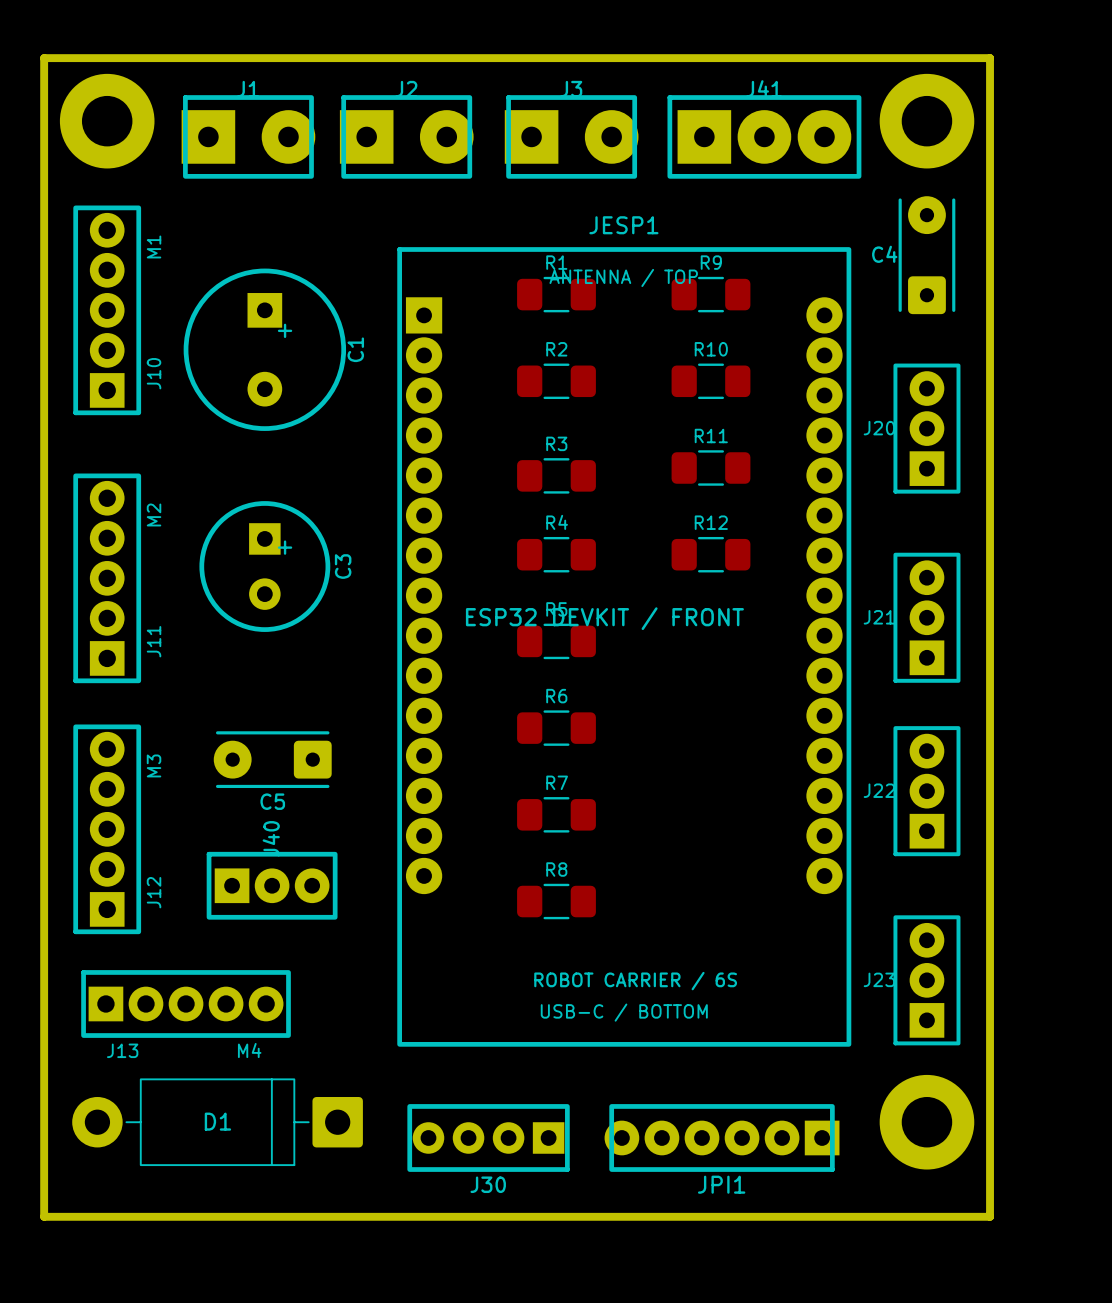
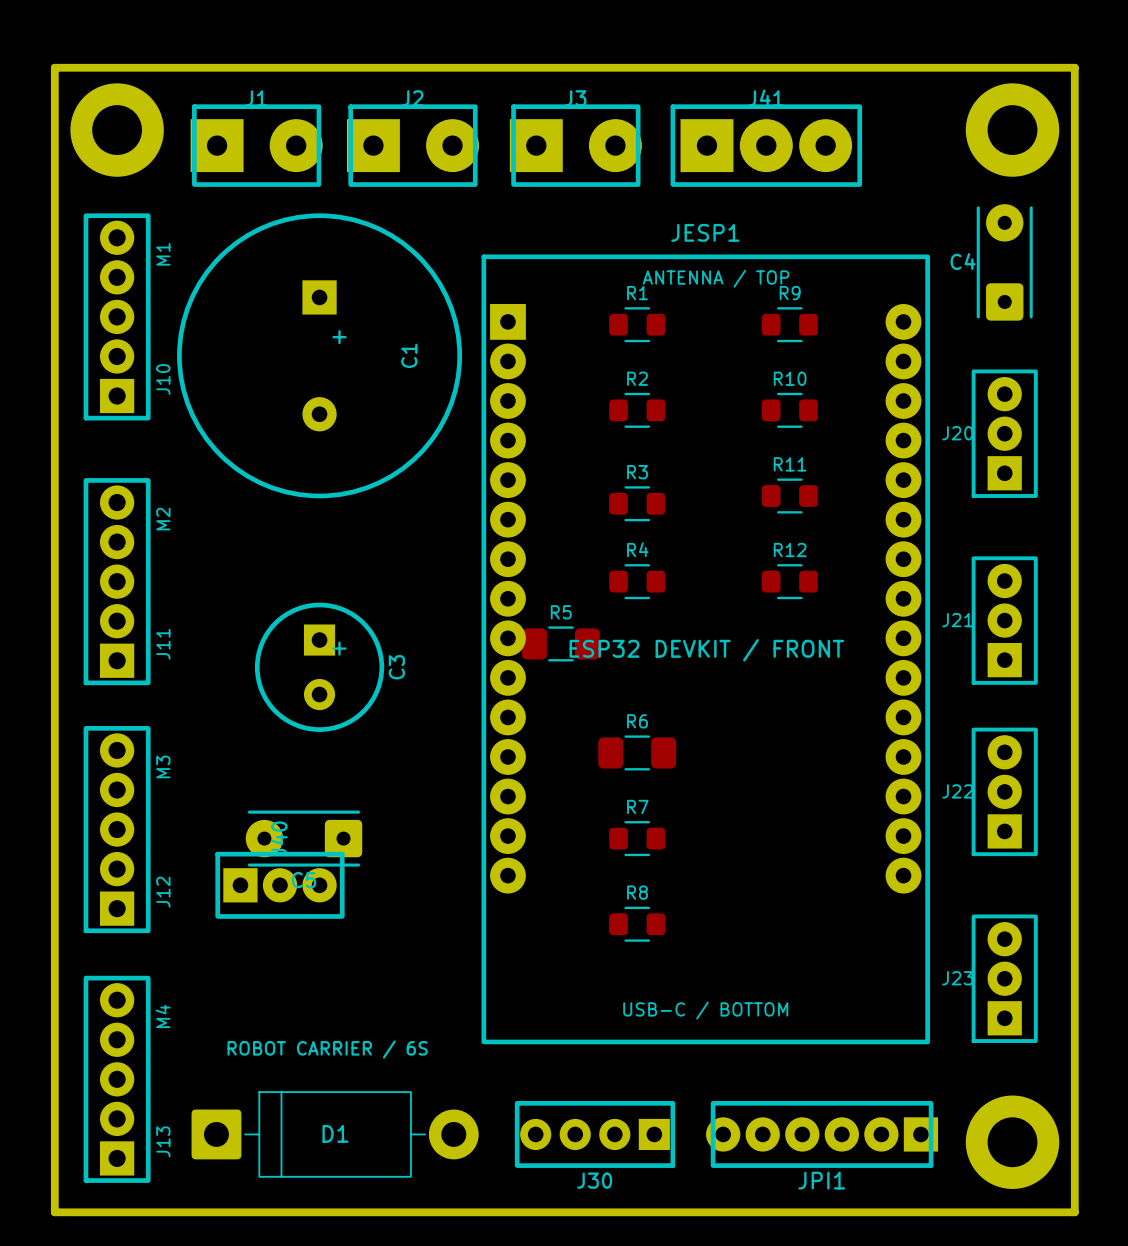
board edge: (990, 58) (990, 1216) -> (989, 67) (1074, 67) (1074, 1212) (989, 1212)
part position: (926, 121) -> (1012, 130)
C4 position: (926, 255) -> (1004, 262)
C1 footprint: [183, 268, 347, 431] -> [177, 213, 463, 499]
R1 footprint: [517, 276, 596, 313] -> [609, 307, 666, 343]
R9 footprint: [671, 276, 751, 313] -> [761, 307, 818, 343]
JESP1 text position: ANTENNA / TOP (623, 277) -> ANTENNA / TOP (716, 278)
R2 footprint: [517, 363, 596, 400] -> [609, 392, 666, 428]
R10 footprint: [671, 363, 751, 400] -> [761, 392, 818, 428]
J20 position: (926, 428) -> (1004, 433)
R11 footprint: [671, 450, 751, 486] -> [761, 478, 818, 514]
R3 footprint: [517, 458, 596, 494] -> [609, 486, 666, 522]
R4 footprint: [517, 536, 596, 573] -> [609, 564, 666, 600]
R12 footprint: [671, 536, 751, 573] -> [761, 564, 818, 600]
C3 position: (264, 566) -> (319, 667)
J21 position: (926, 617) -> (1004, 620)
text position: ESP32 DEVKIT / FRONT (604, 618) -> ESP32 DEVKIT / FRONT (706, 650)
JESP1 position: (624, 646) -> (705, 649)
R6 position: (556, 728) -> (637, 752)
C5 position: (272, 759) -> (303, 838)
J22 position: (926, 791) -> (1004, 791)
R7 footprint: [517, 797, 596, 833] -> [609, 821, 666, 857]
R8 footprint: [517, 883, 596, 920] -> [609, 906, 666, 942]
J23 position: (926, 980) -> (1004, 978)
text position: ROBOT CARRIER / 6S (635, 981) -> ROBOT CARRIER / 6S (327, 1049)
J13 rotation: 0° (186, 1003) -> 90° counterclockwise (117, 1079)
D1 rotation: 0° (217, 1122) -> 180° (335, 1134)
part position: (926, 1122) -> (1012, 1142)
J30 position: (488, 1137) -> (595, 1134)
JPI1 position: (722, 1137) -> (822, 1134)

